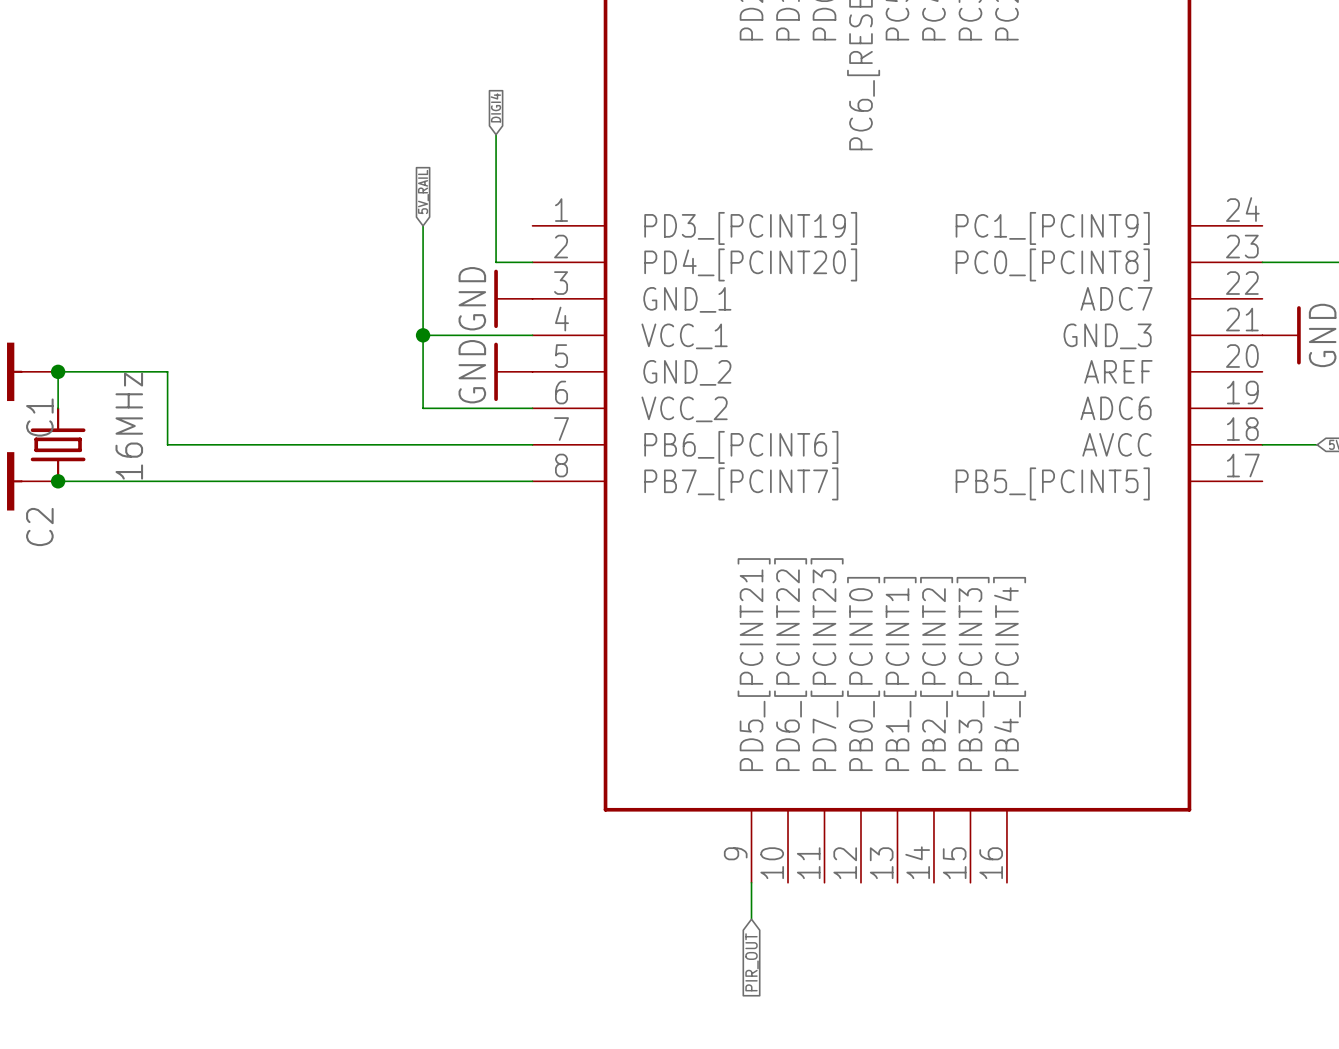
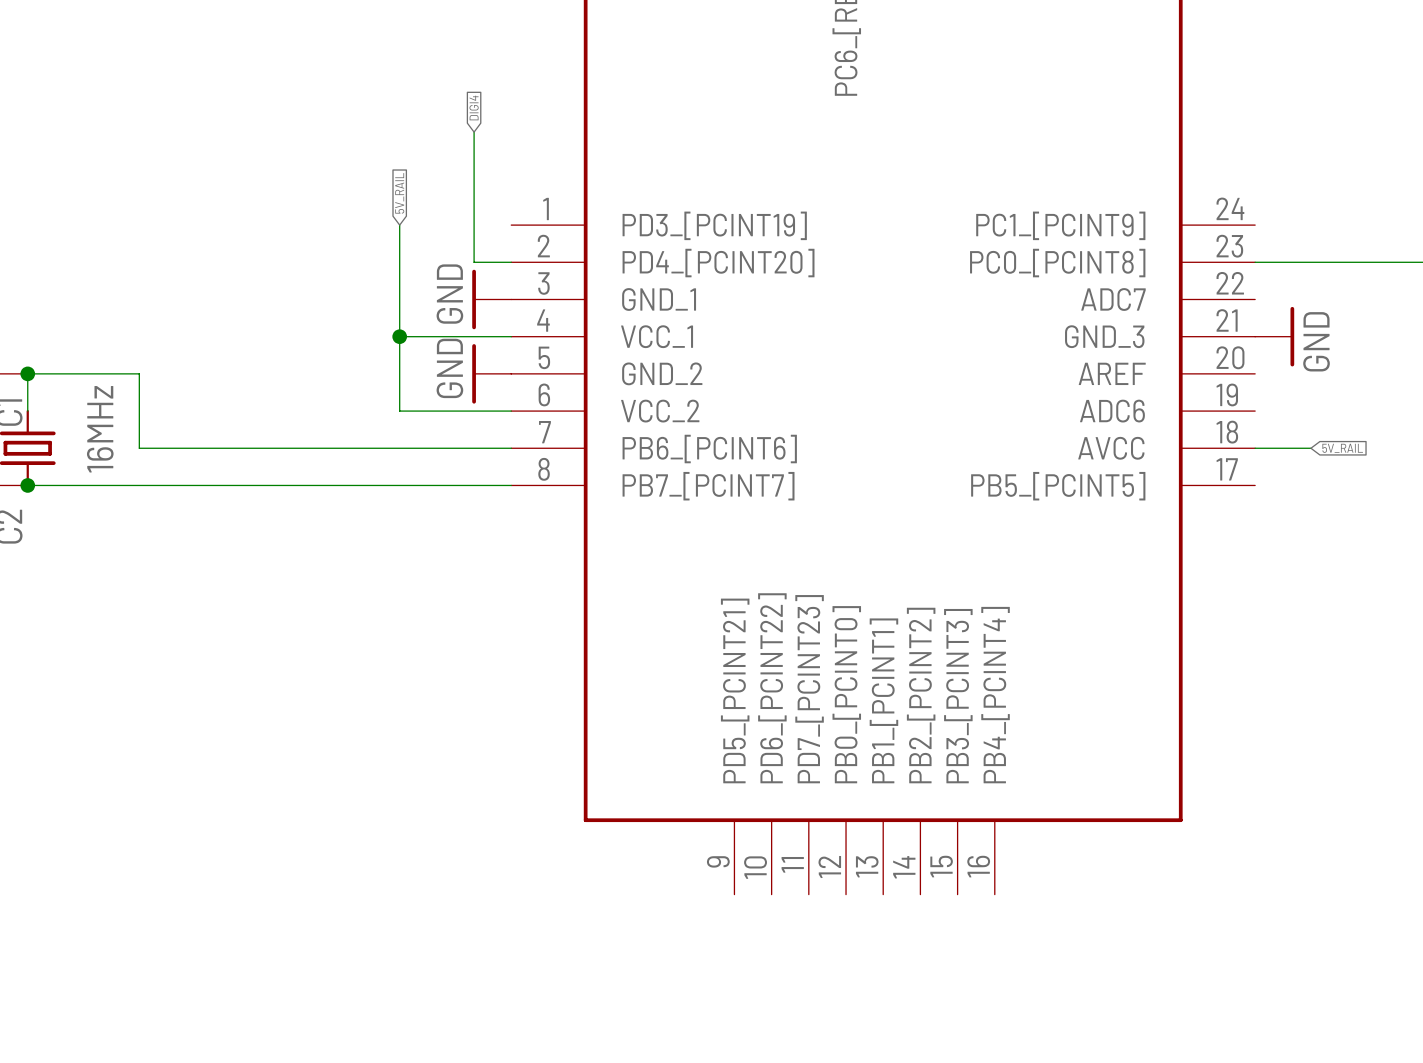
wire: (751, 882) (751, 919) -> none
global label: PIR_OUT (752, 962) -> none

